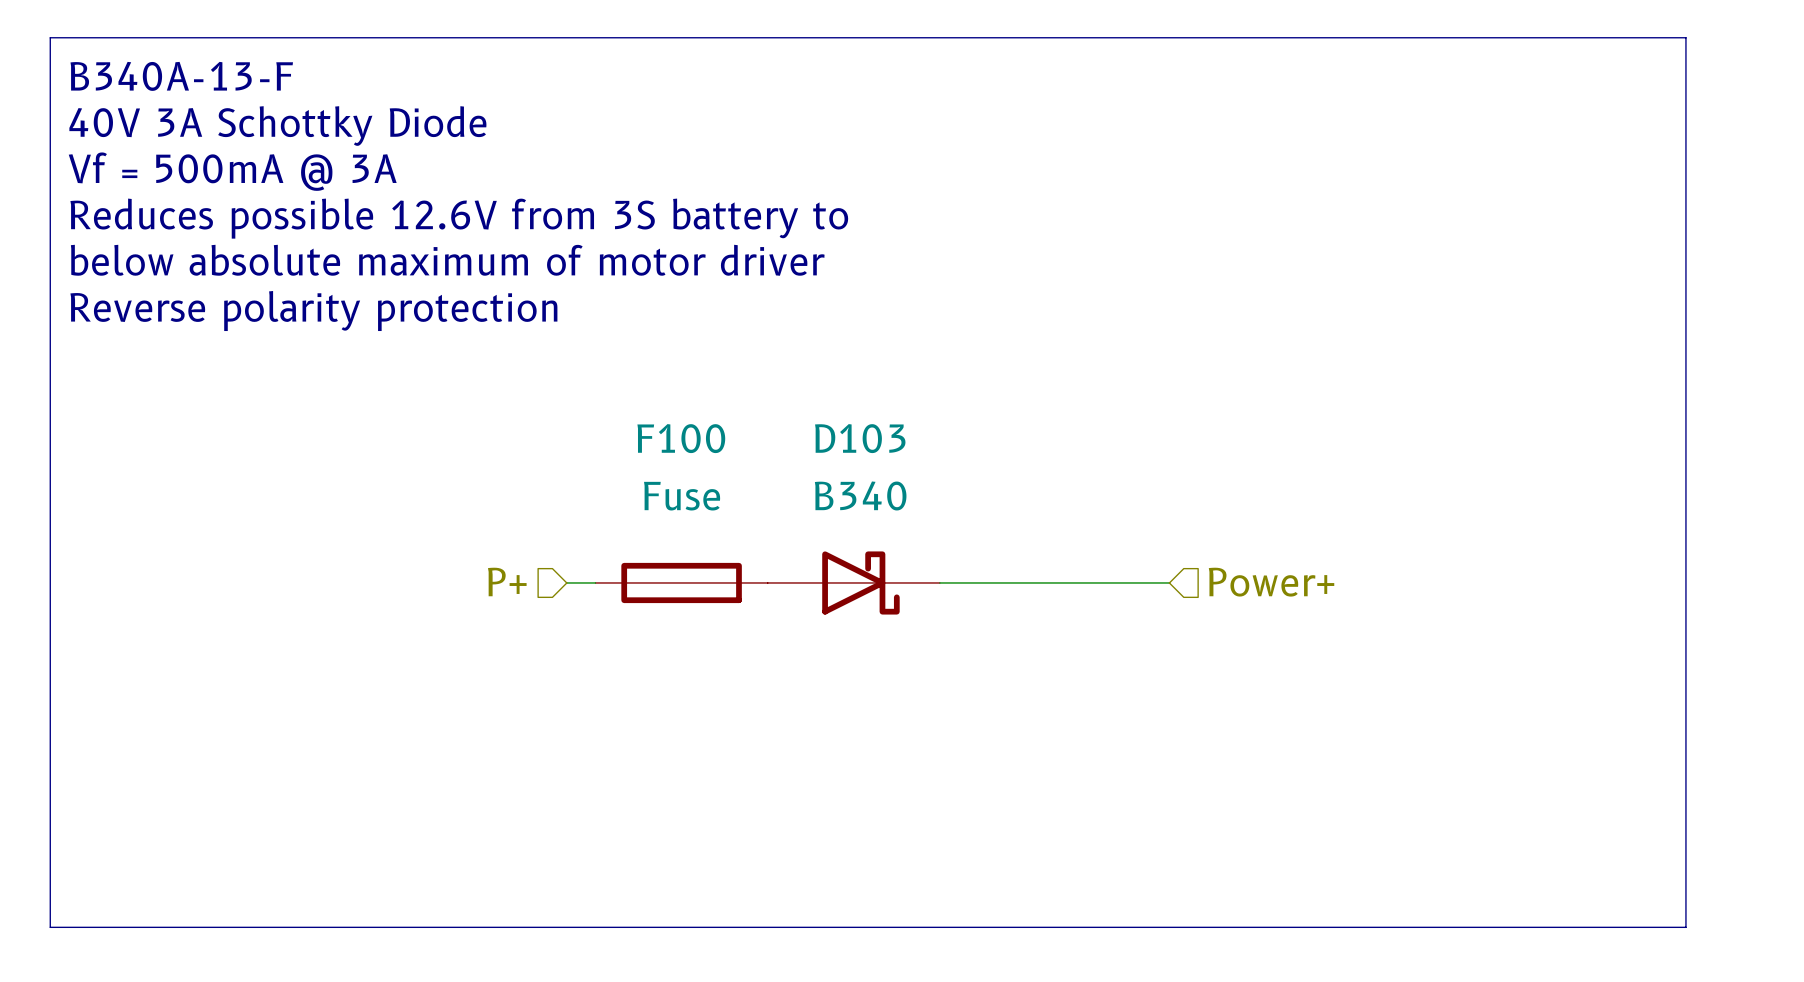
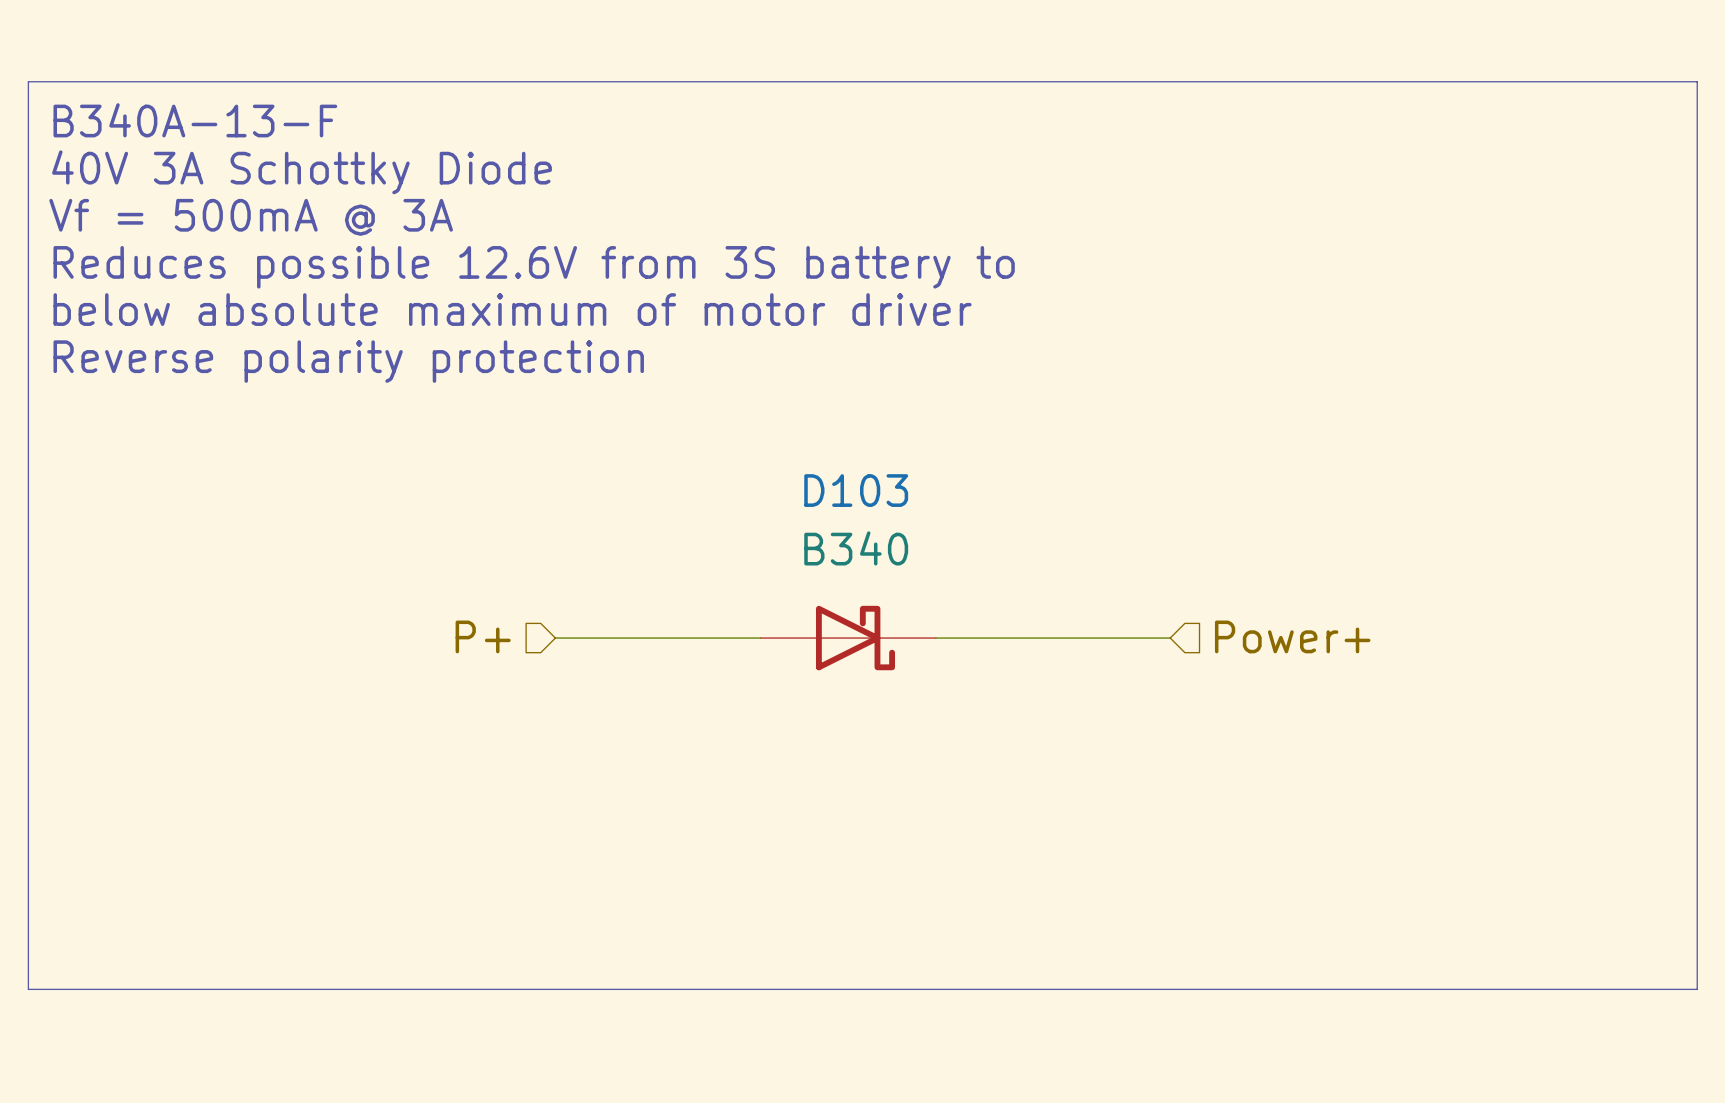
F100: Fuse (681, 582) -> none

